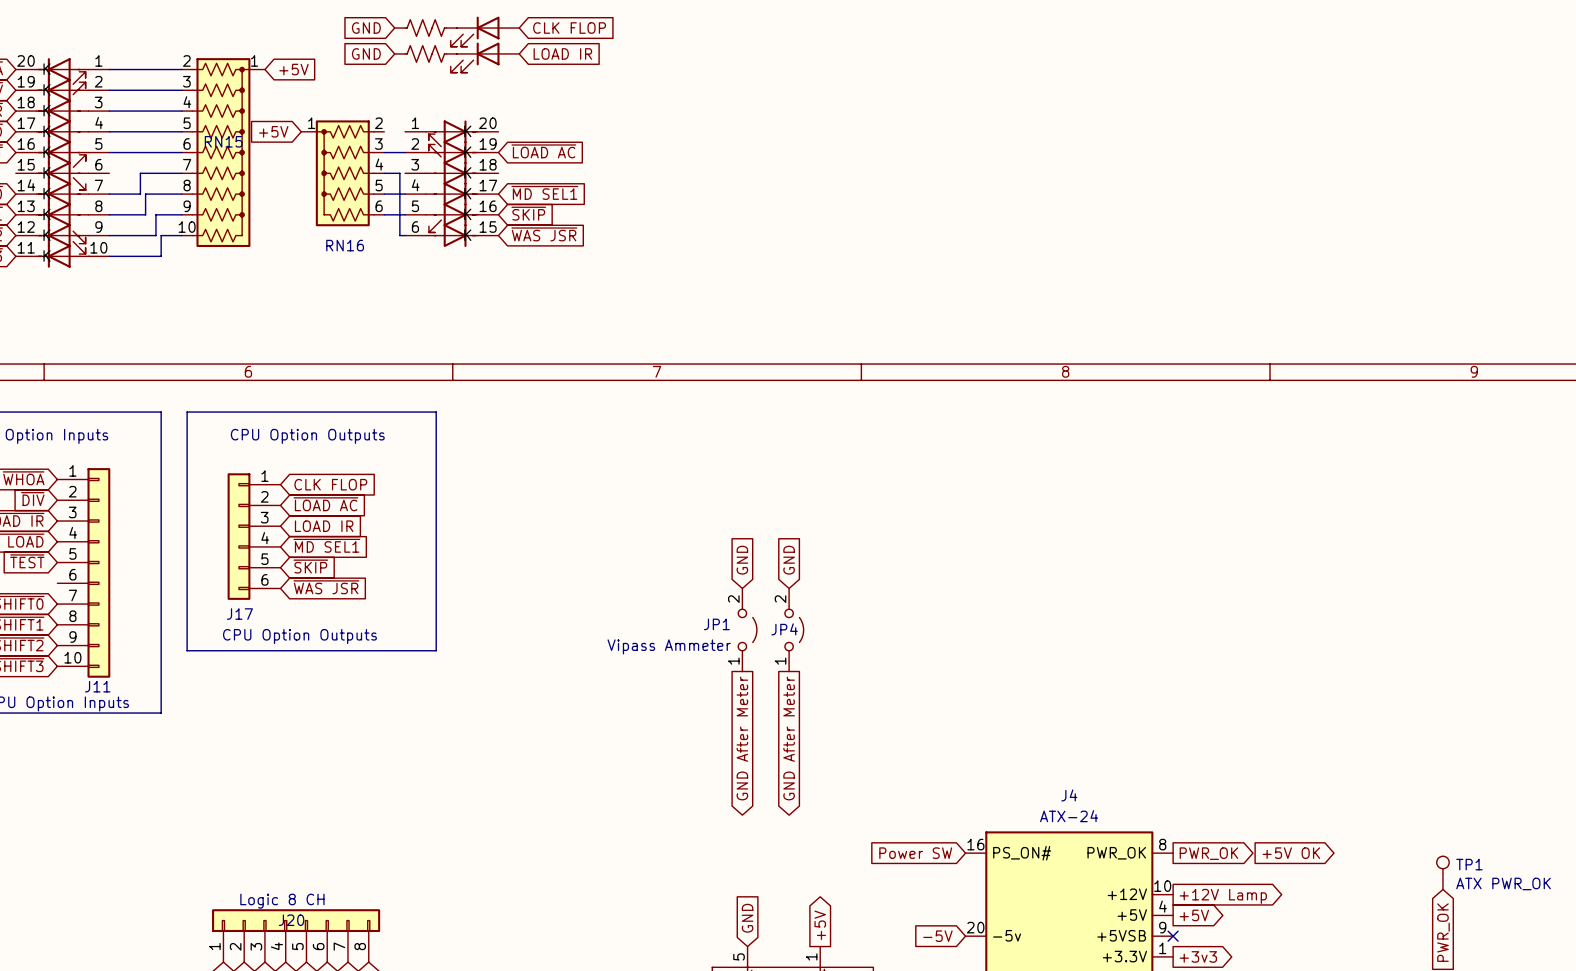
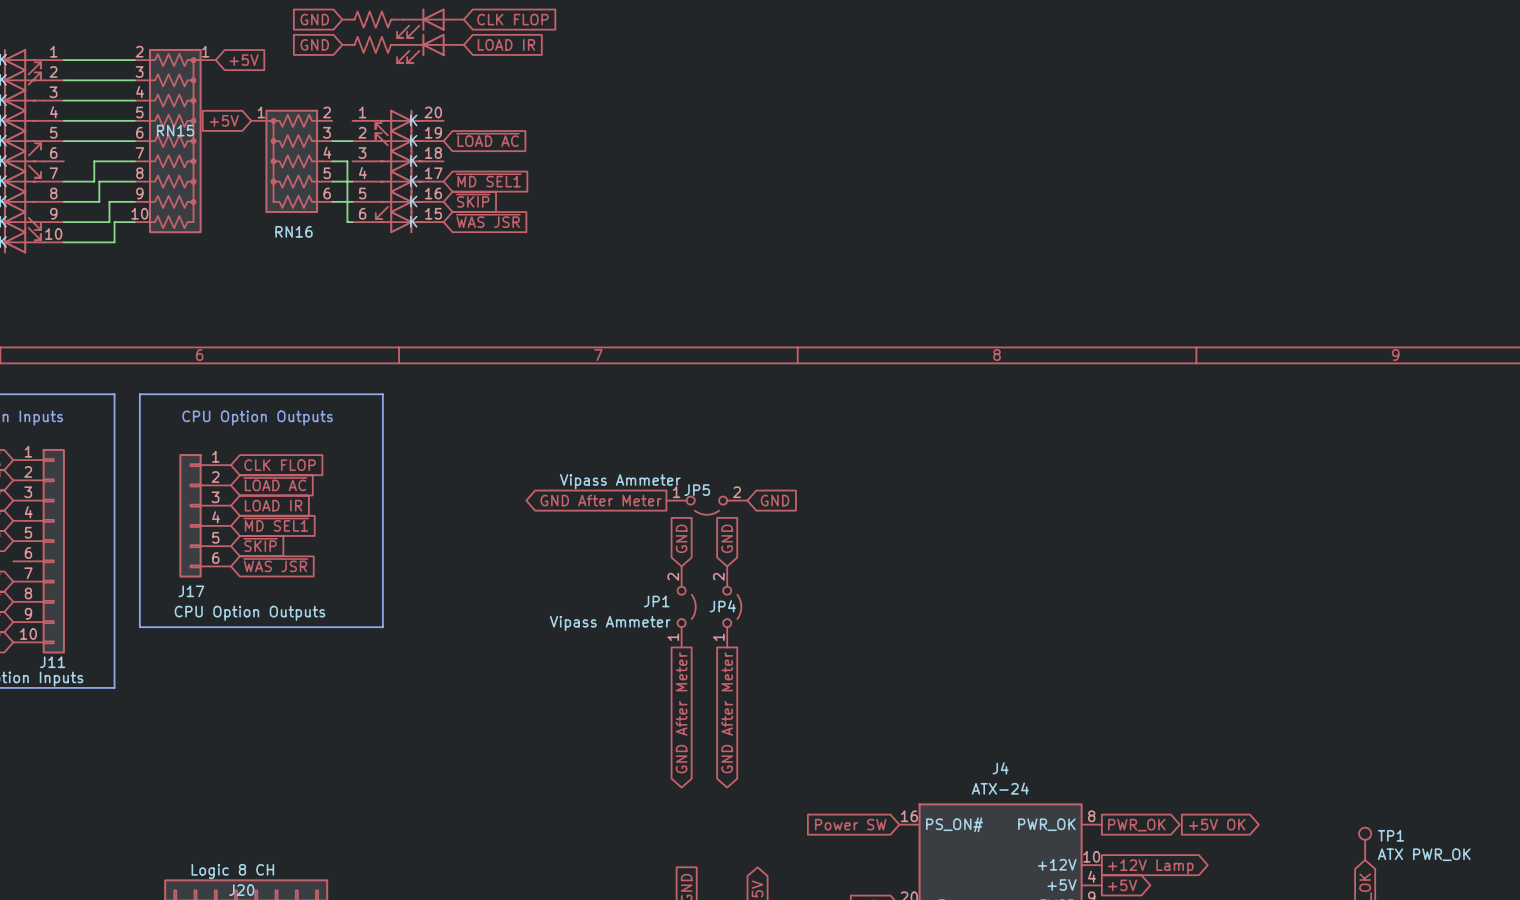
global label: none -> GND After Meter (601, 500)
global label: none -> GND (775, 500)
JP5: none -> Vipass Ammeter (706, 505)

